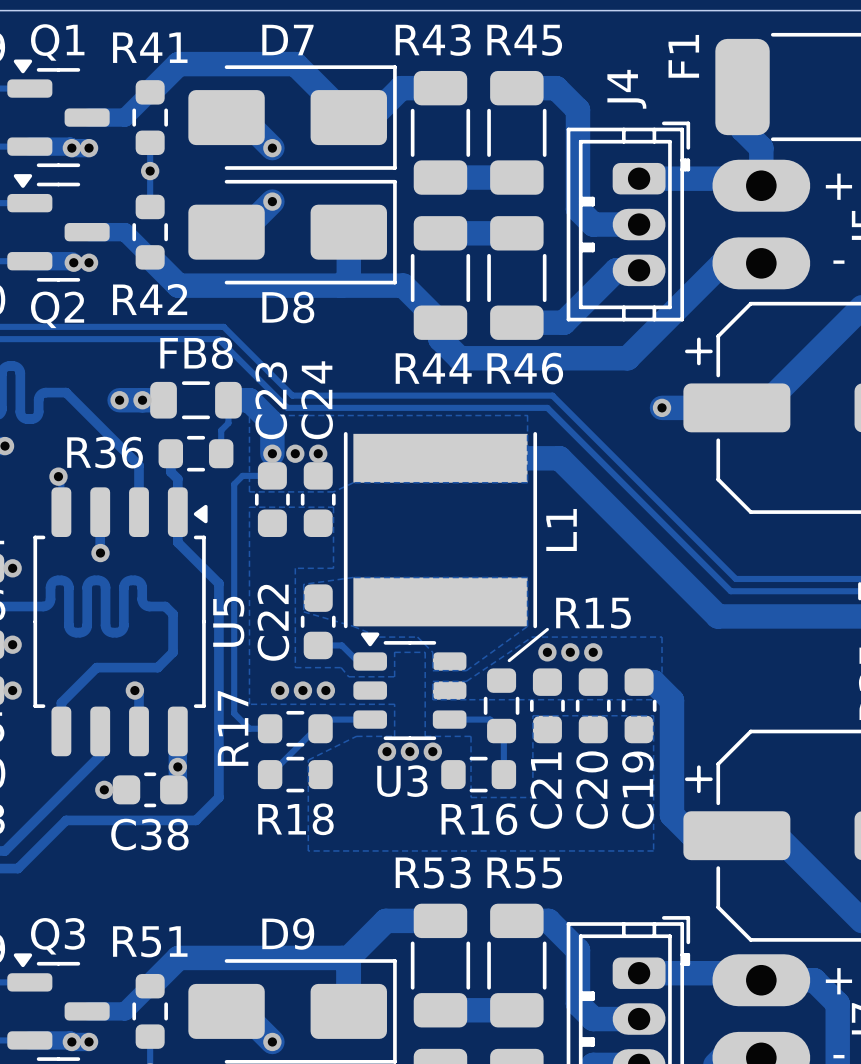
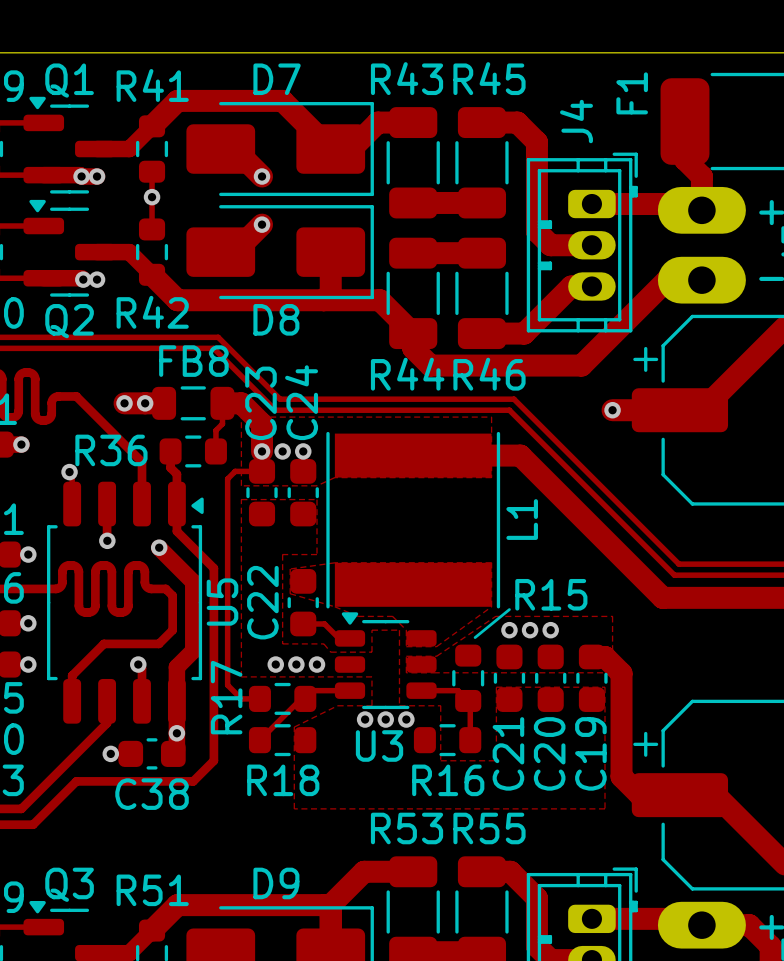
via: none -> (159, 547)
track: none -> (159, 547) (193, 582) (193, 650) (176, 667) (176, 701)
via: (280, 690) -> none
via: none -> (275, 664)
via: (302, 690) -> none
via: none -> (296, 664)
via: (325, 690) -> none
via: none -> (317, 664)

